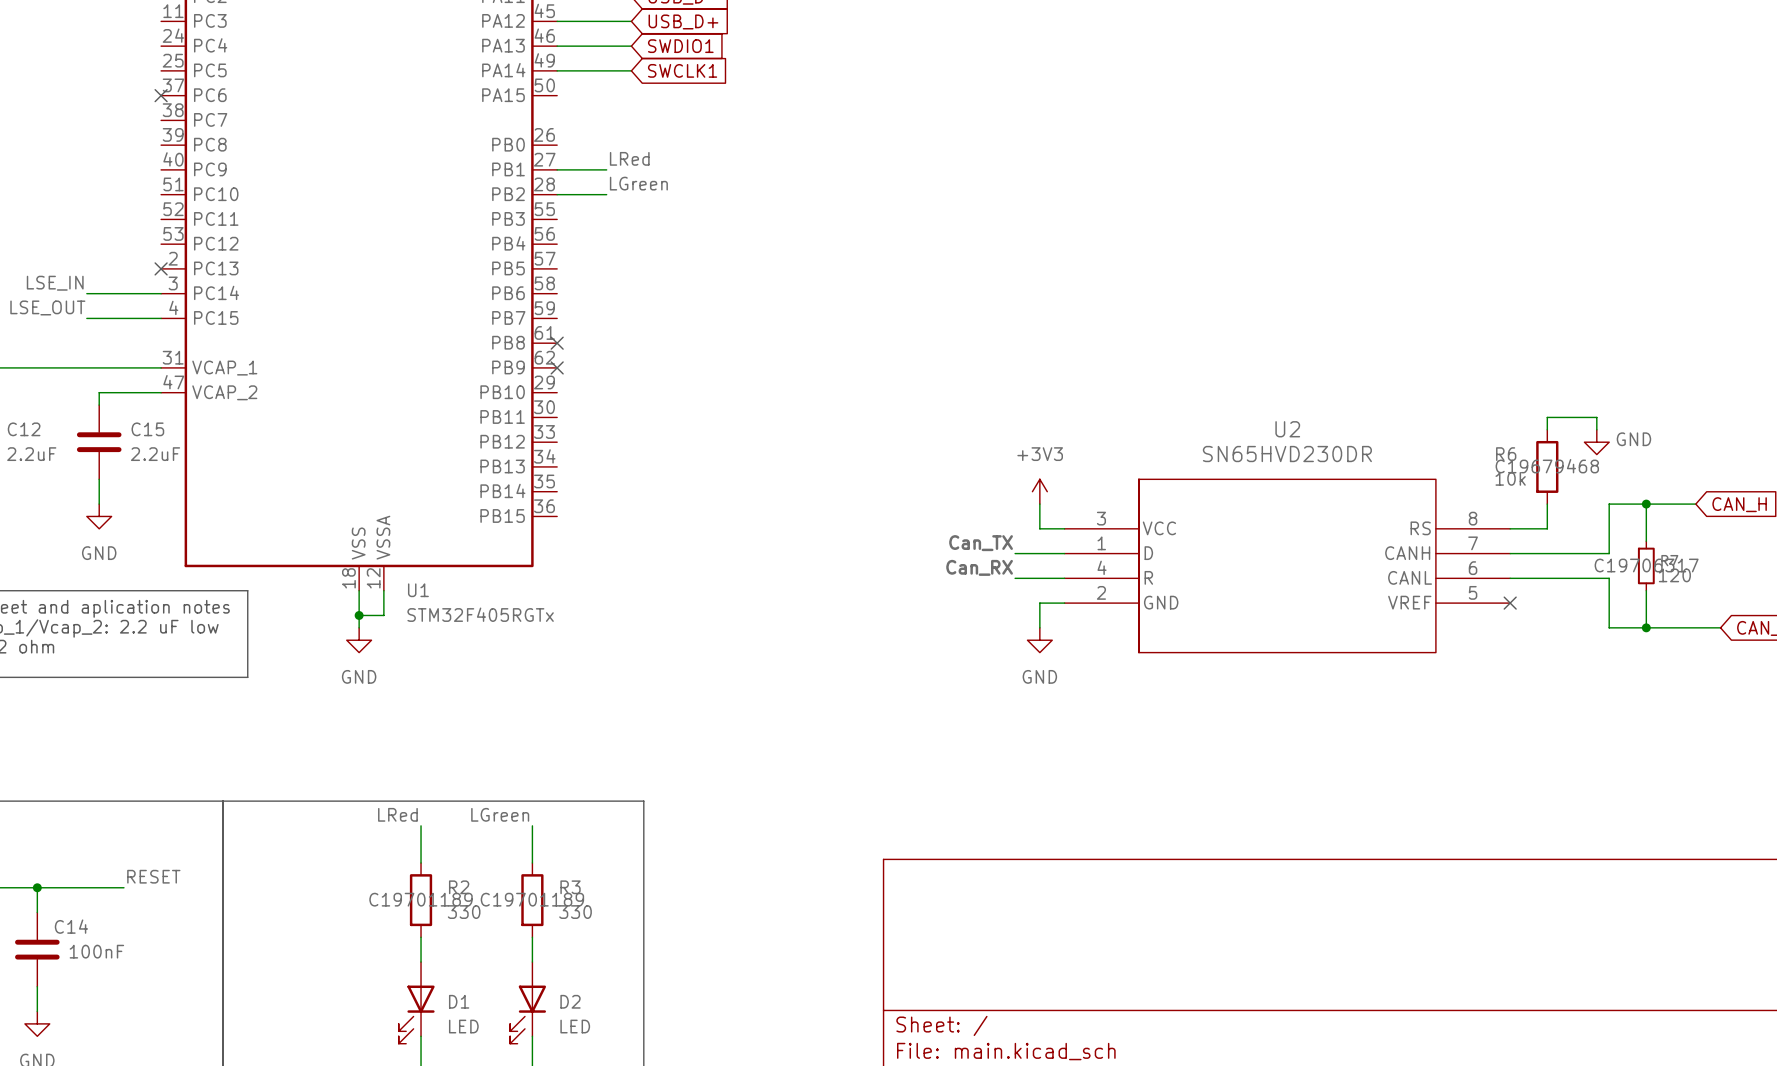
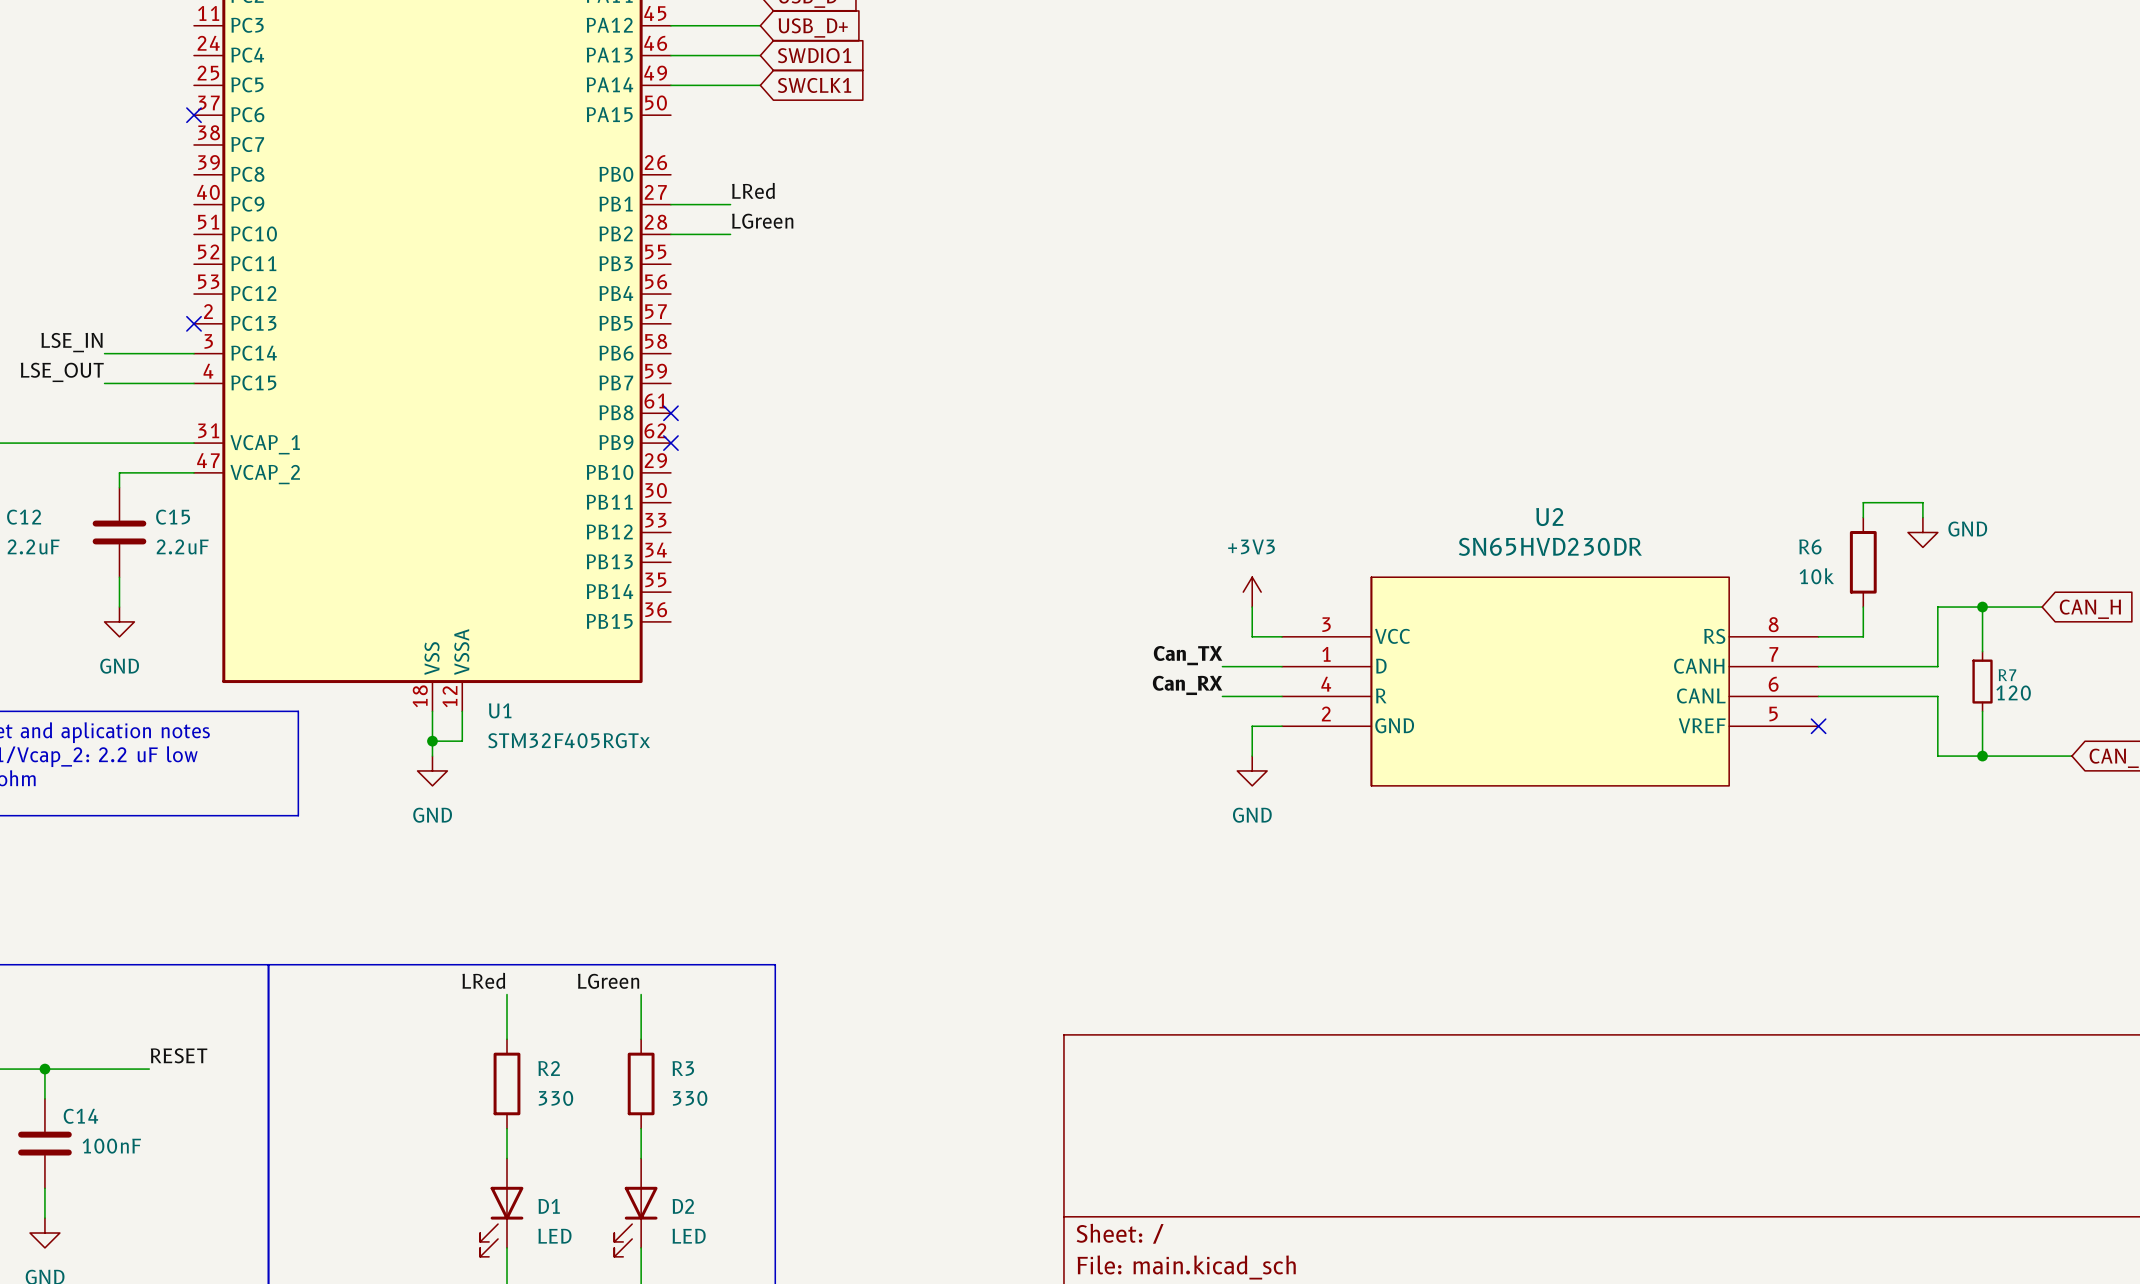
R6 text: C19679468 (1547, 466) -> none
R7 text: C19706317 (1646, 565) -> none
R2 text: C19701189 (421, 899) -> none
R3 text: C19701189 (532, 899) -> none

